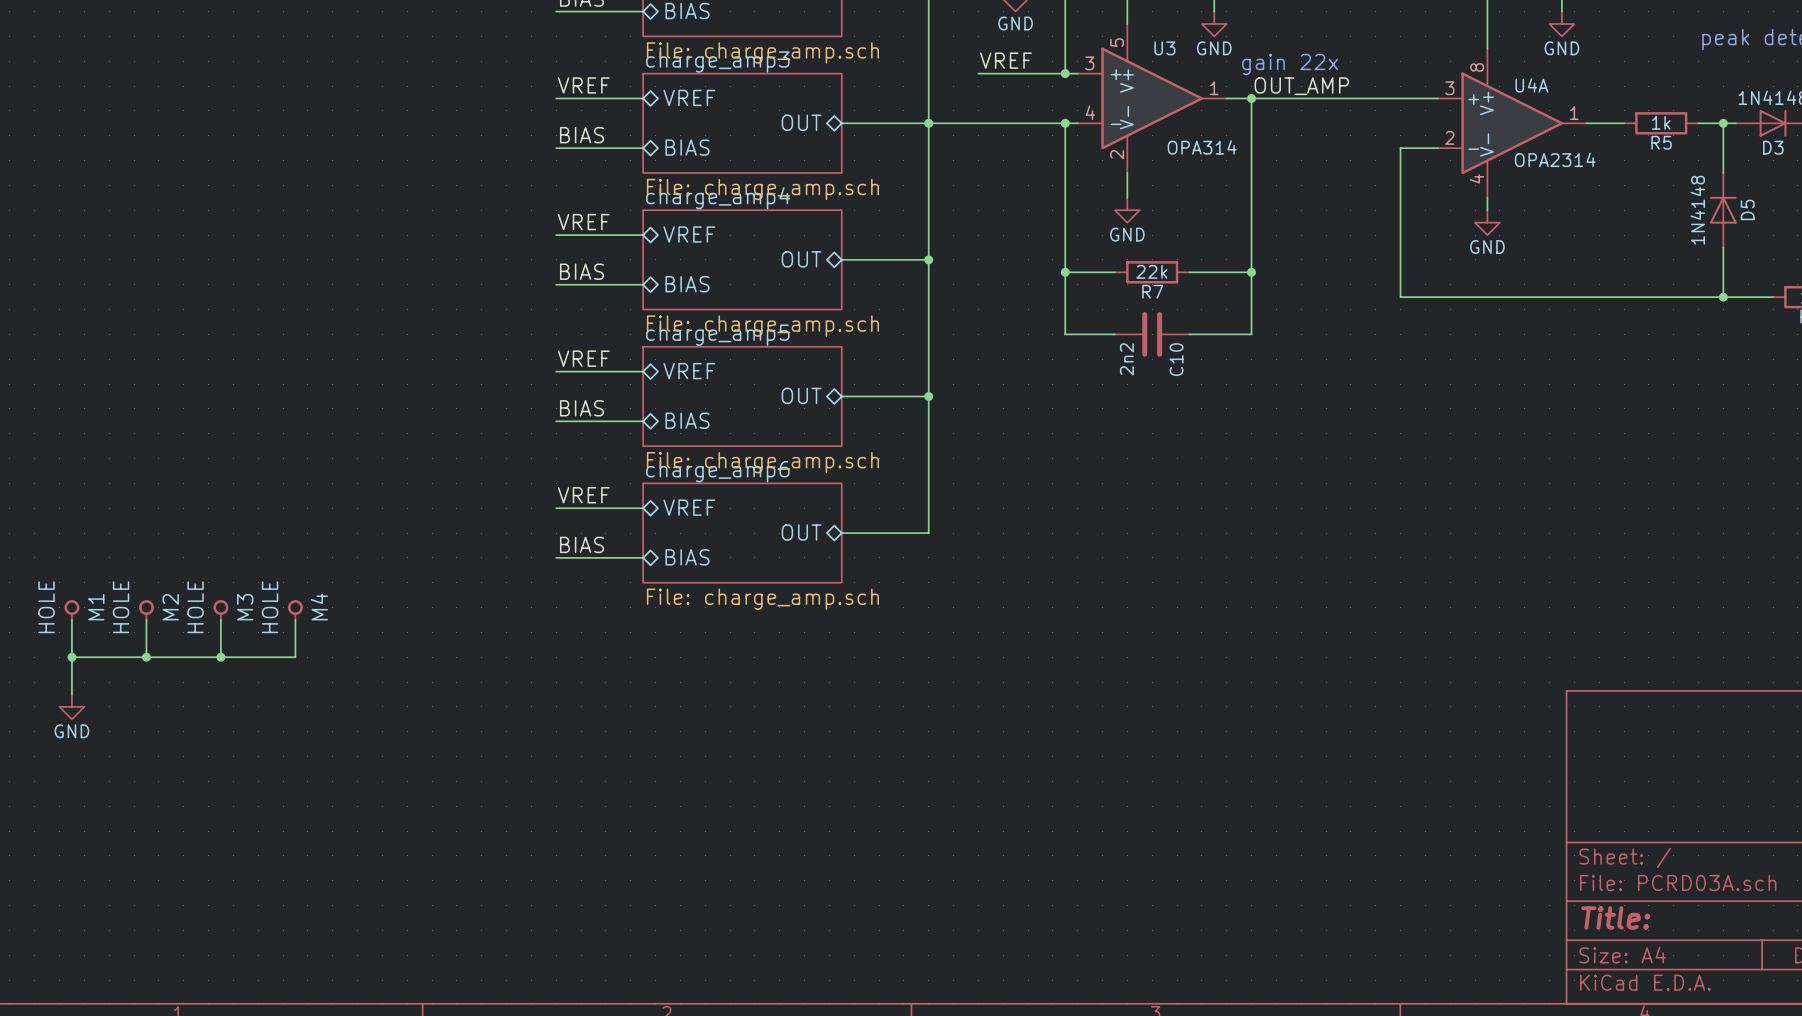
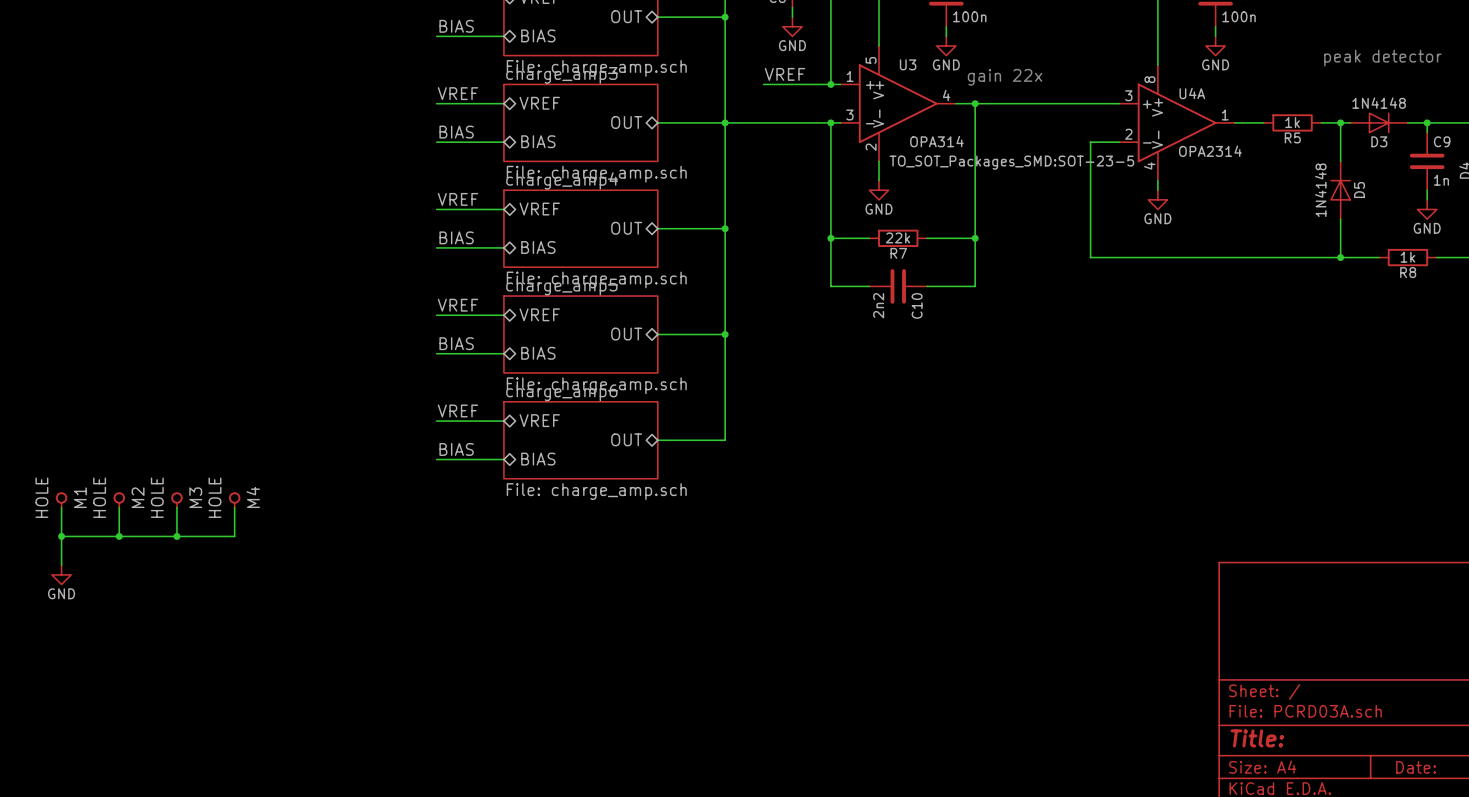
U3 pin number: 3 (1089, 63) -> 1 (850, 76)
label: OUT_AMP (1301, 86) -> none
U3 pin number: 1 (1214, 88) -> 4 (946, 95)
U3 pin number: 4 (1090, 112) -> 3 (849, 114)
U3 text: none -> TO_SOT_Packages_SMD:SOT-23-5 (1011, 162)

